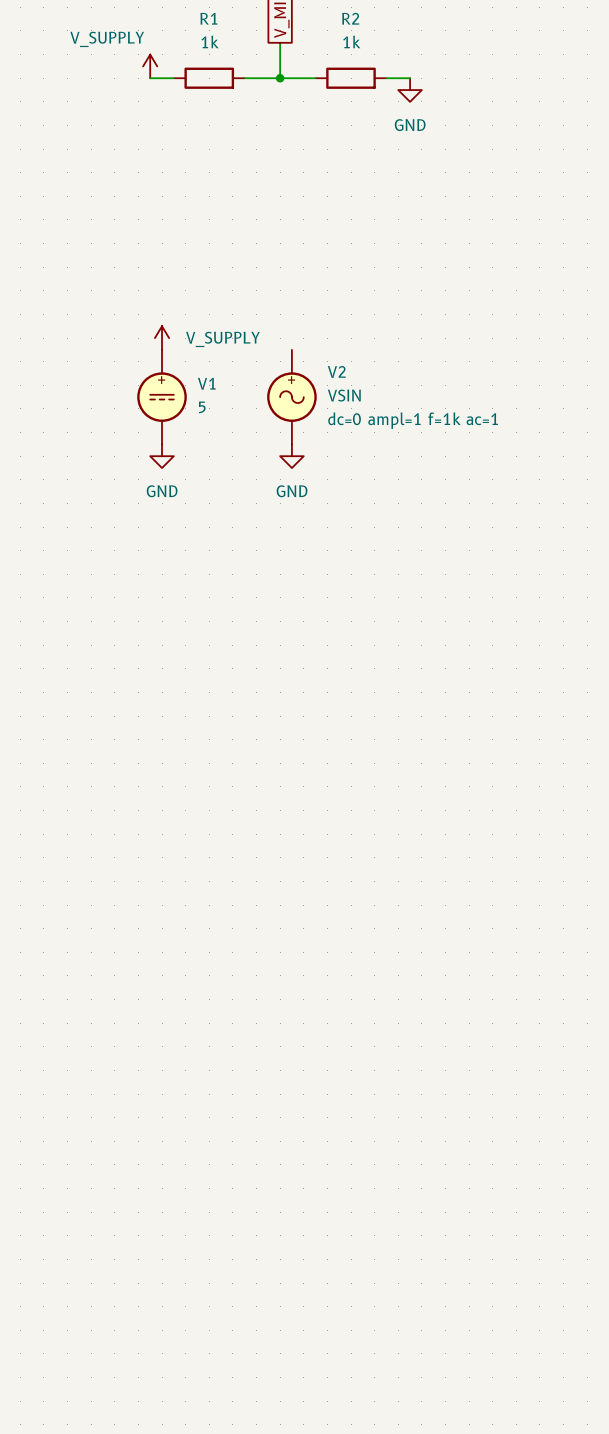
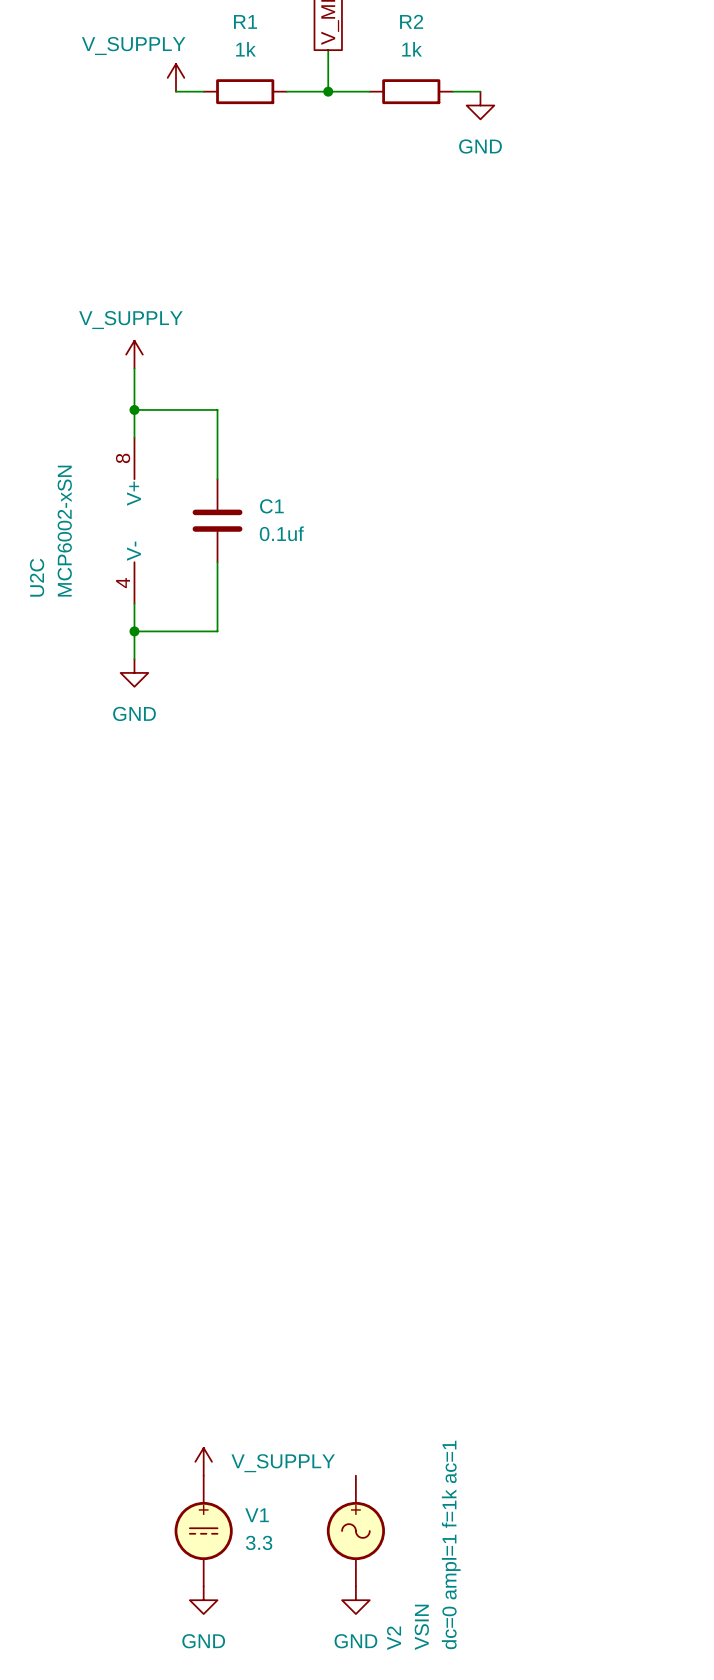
wire: none -> (134, 368) (134, 437)
power symbol position: V_SUPPLY (162, 338) -> V_SUPPLY (134, 354)
power symbol text position: V_SUPPLY (222, 339) -> V_SUPPLY (130, 320)
wire: none -> (134, 409) (217, 409) (217, 479)
junction: none -> (134, 409)
V2 name rotation: 0° (336, 371) -> 90° counterclockwise (394, 1638)
V2 name position: V2 (336, 371) -> V2 (394, 1638)
V2 value rotation: 0° (344, 395) -> 90° counterclockwise (421, 1627)
V2 value position: VSIN (344, 395) -> VSIN (421, 1627)
V1 position: (162, 397) -> (203, 1531)
V2 position: (291, 397) -> (355, 1531)
V1 value: 5 (202, 407) -> 3.3 (259, 1542)
V2 text rotation: 0° (413, 420) -> 90° counterclockwise (451, 1544)
U2C: none -> MCP6002-xSN (134, 520)
C1: none -> 0.1uf (217, 520)
power symbol: GND (162, 456) -> none
power symbol: GND (291, 456) -> none
wire: none -> (217, 562) (217, 631) (134, 631)
wire: none -> (134, 603) (134, 659)
junction: none -> (134, 631)
power symbol: none -> GND (134, 672)
power symbol: none -> V_SUPPLY (203, 1461)
power symbol: none -> GND (203, 1600)
power symbol: none -> GND (355, 1600)

